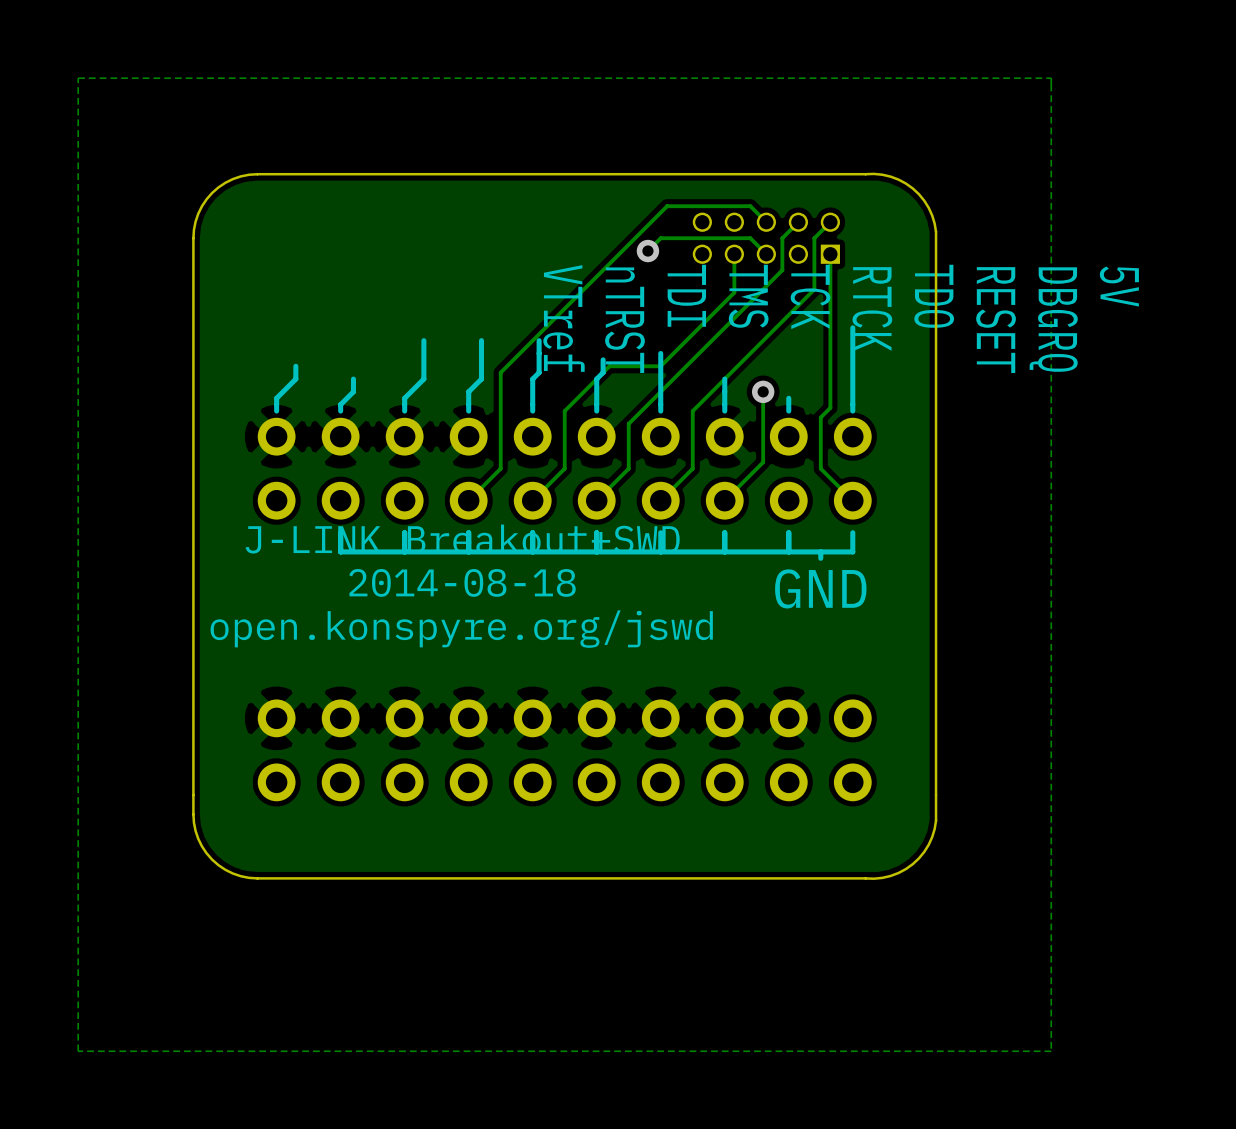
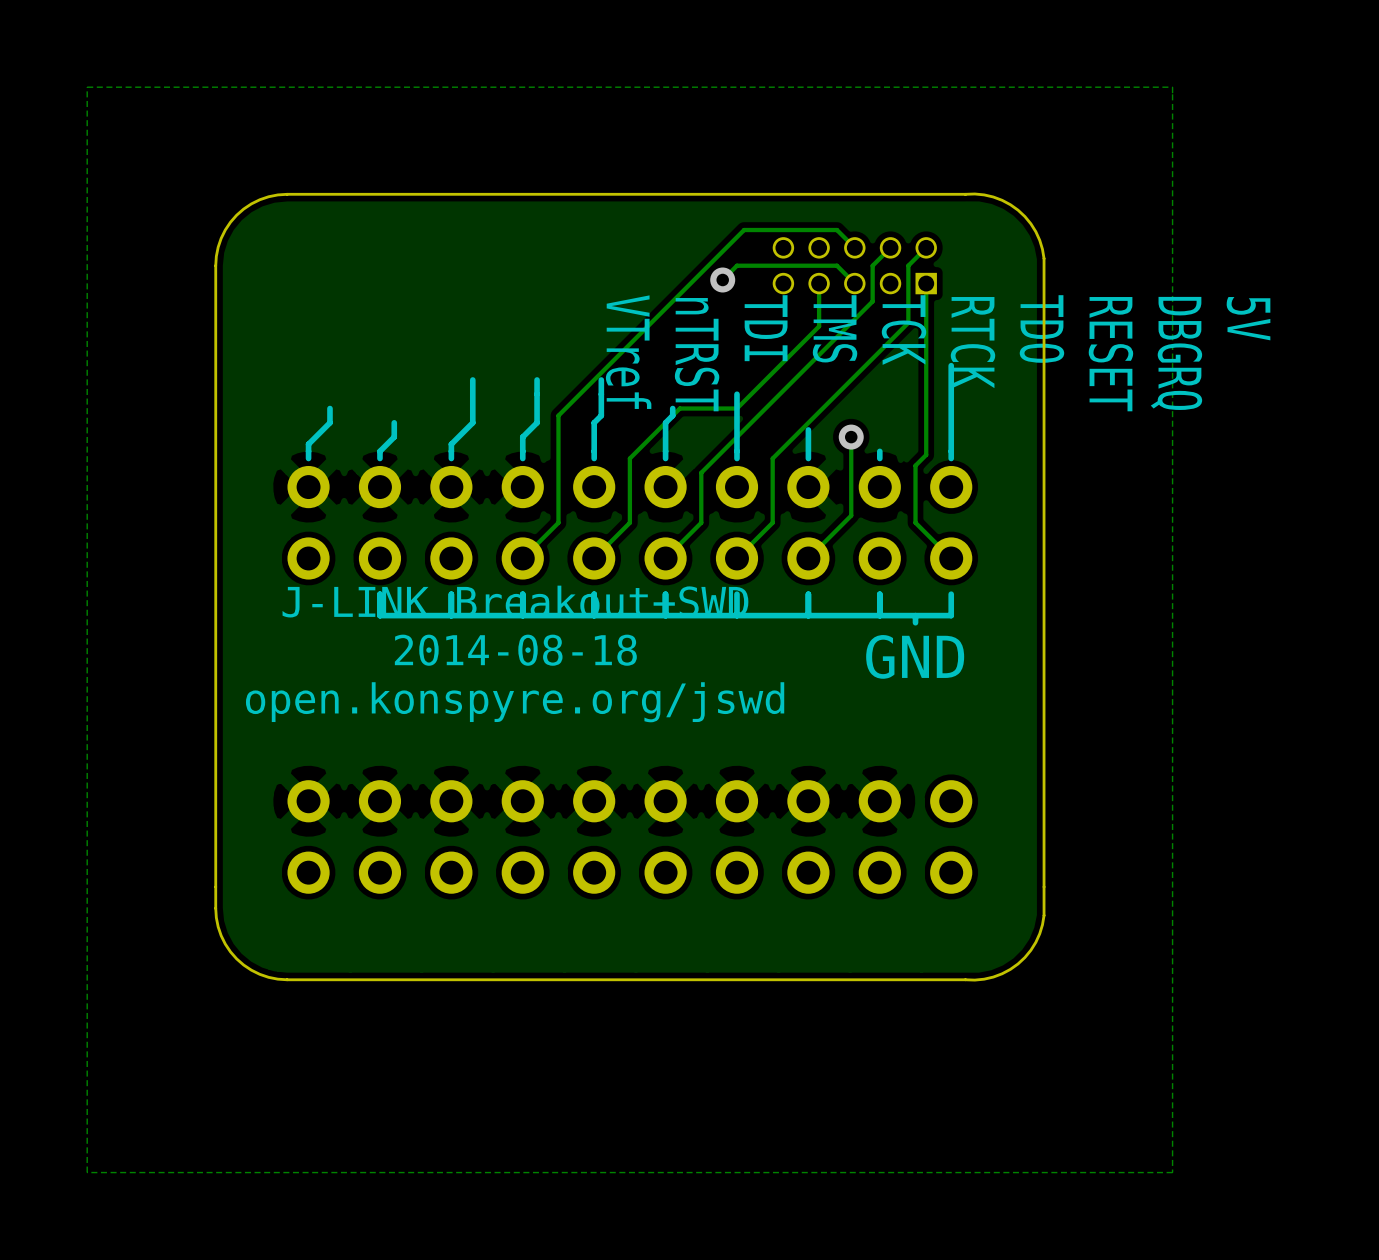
line: (603, 359) (603, 366) -> none
line: (724, 379) (724, 385) -> none
line: (788, 398) (788, 404) -> none

